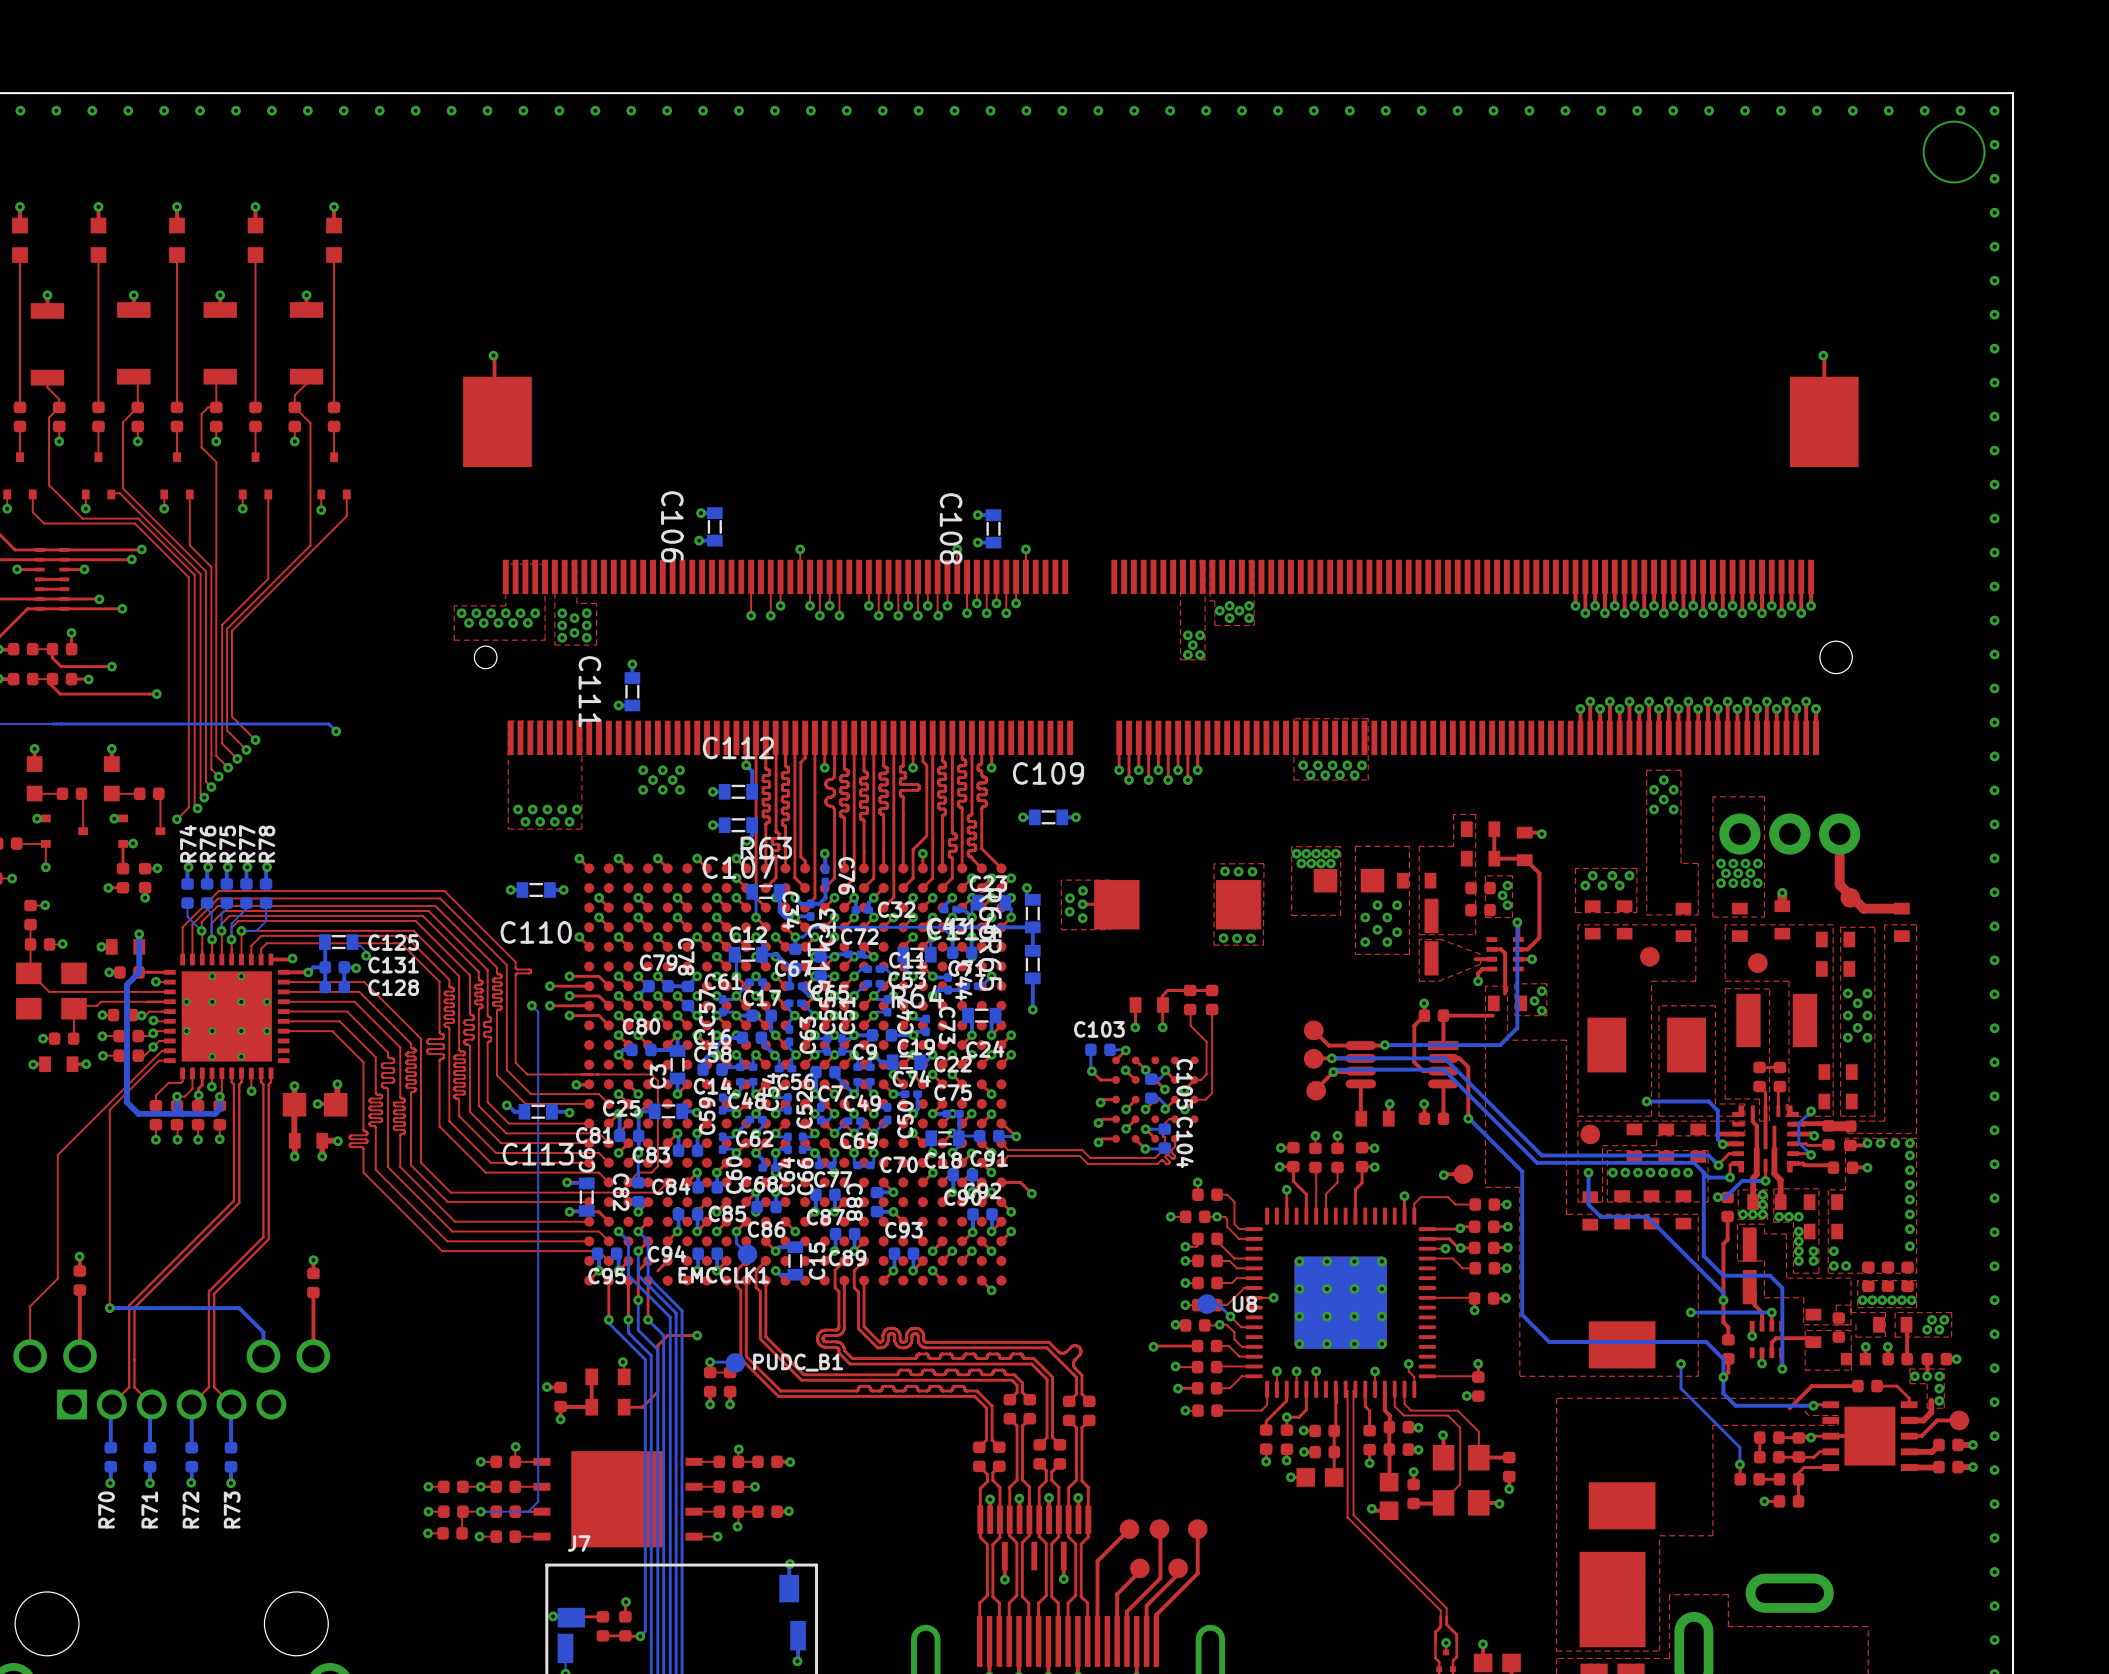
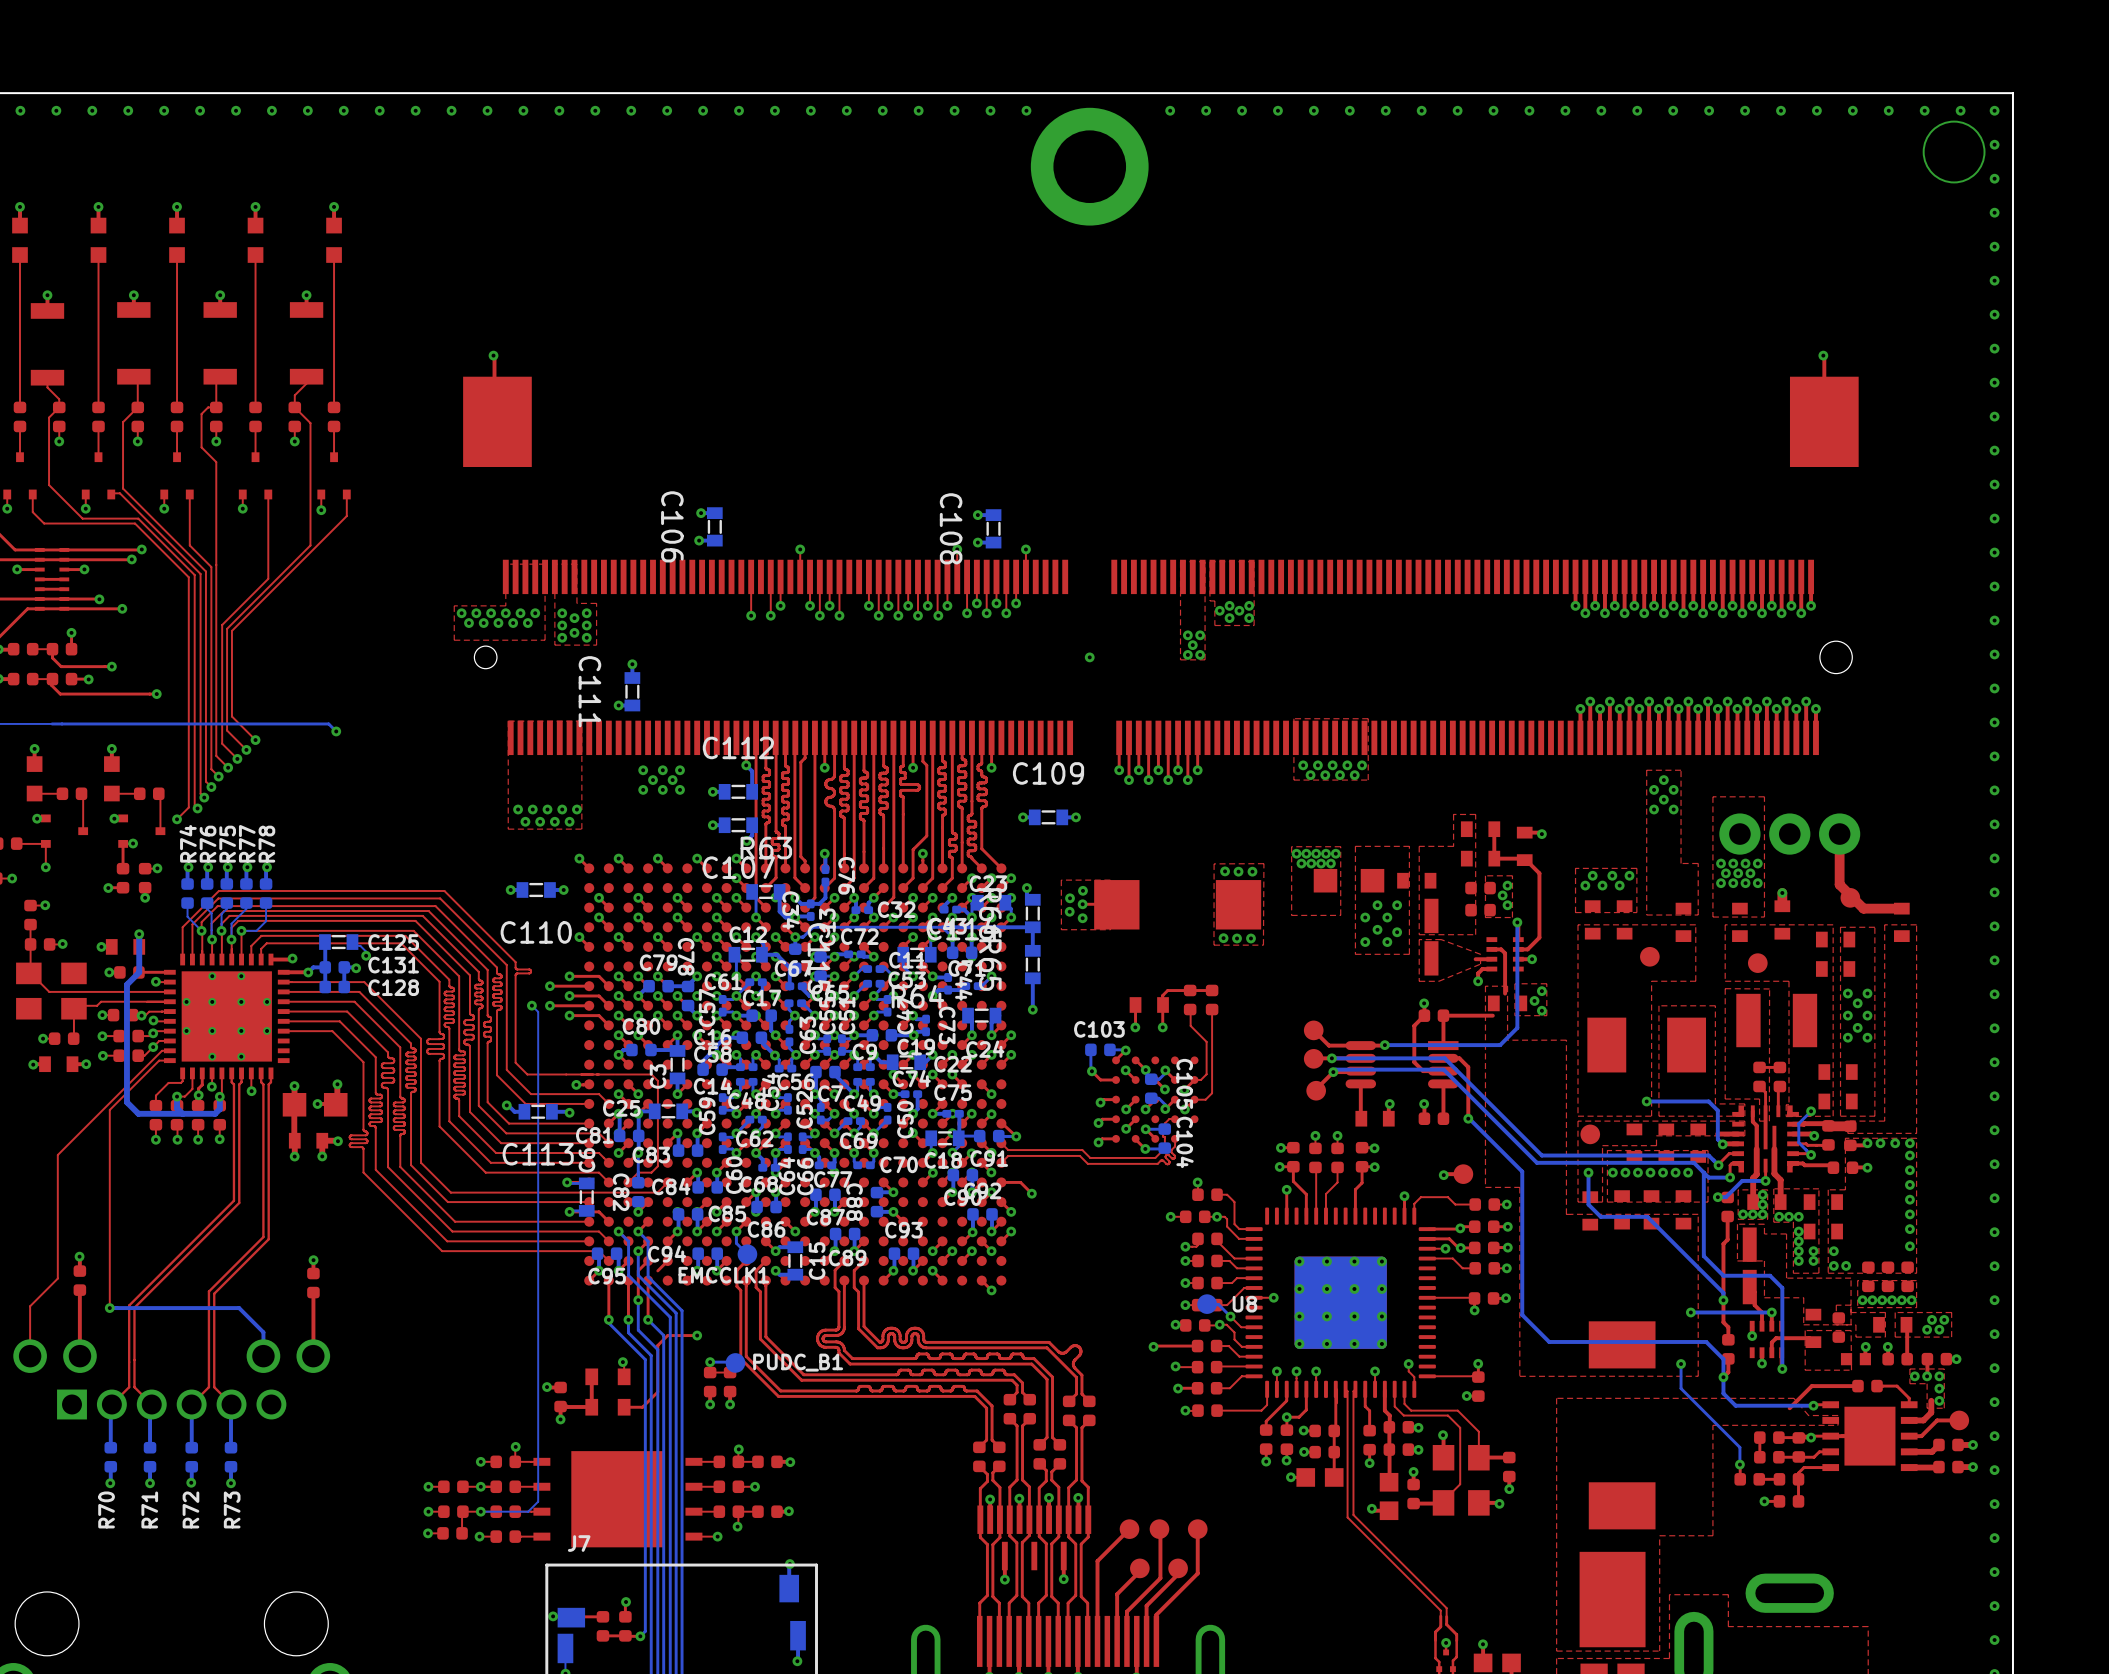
via: (1062, 110) -> none
via: (1098, 110) -> none
via: (1134, 110) -> none
part: none -> (1089, 166)
via: none -> (1089, 657)

